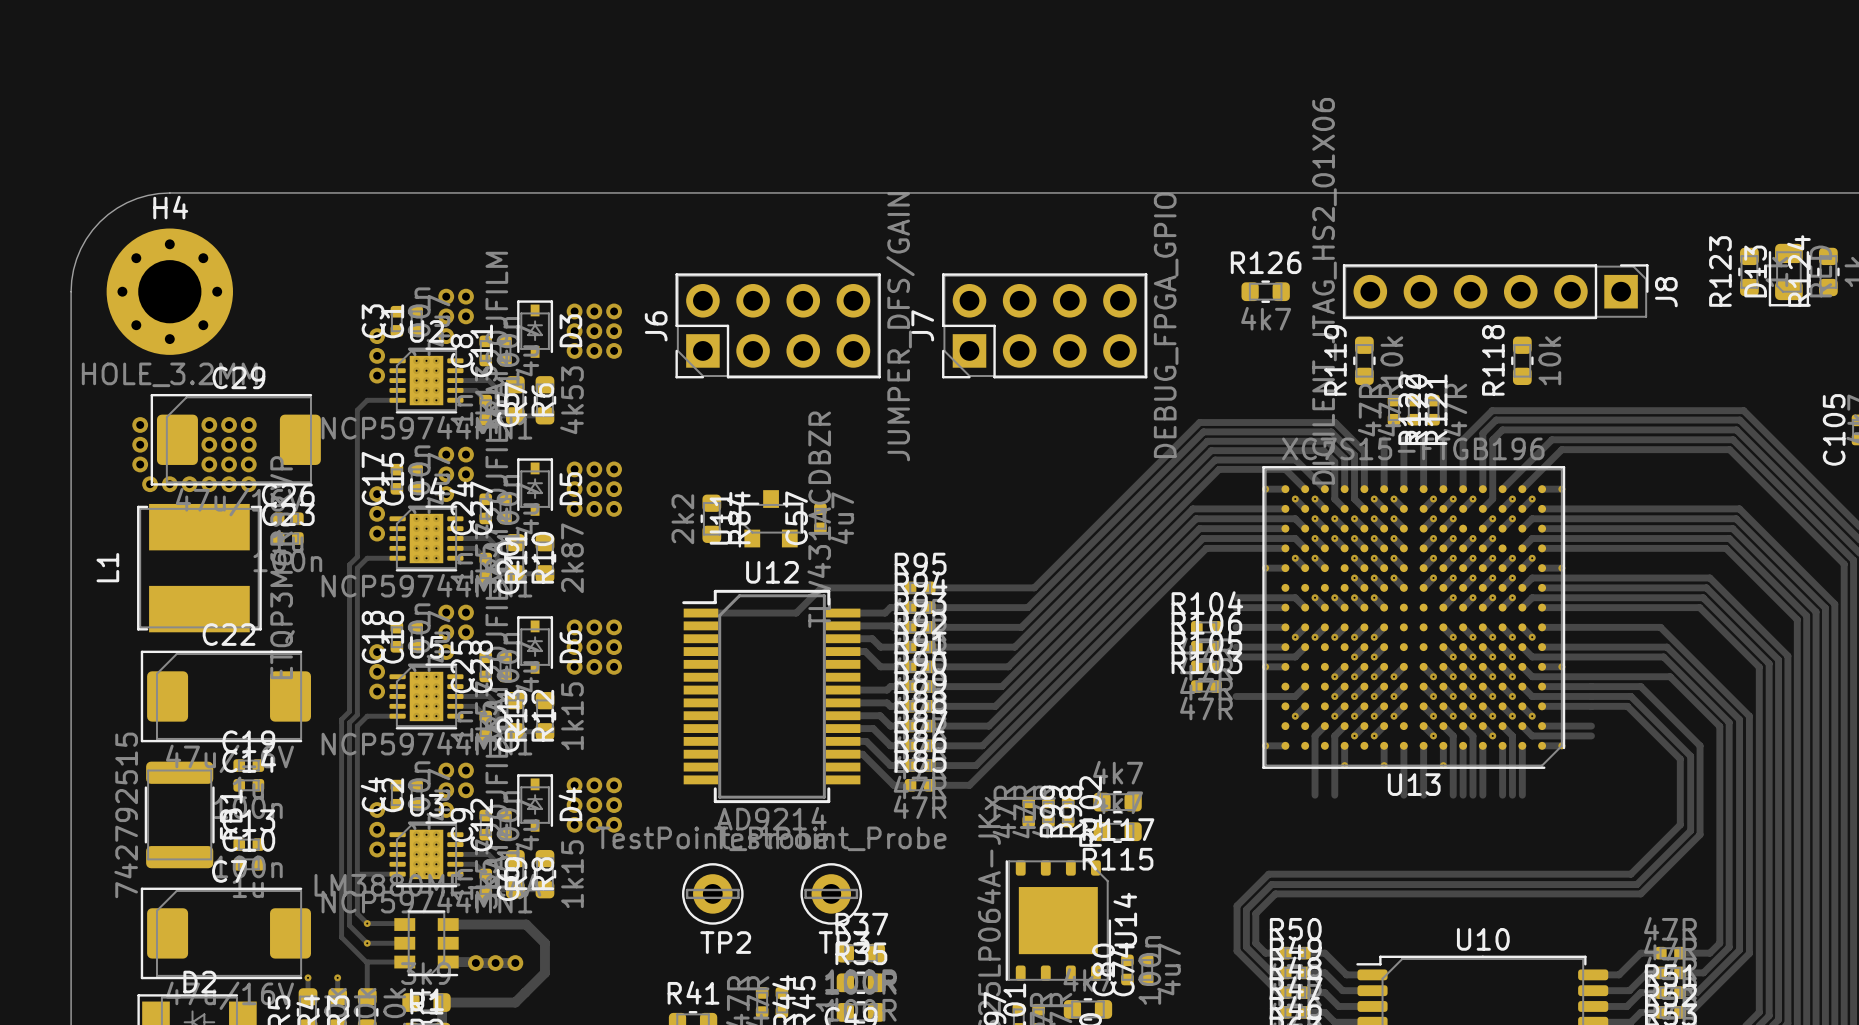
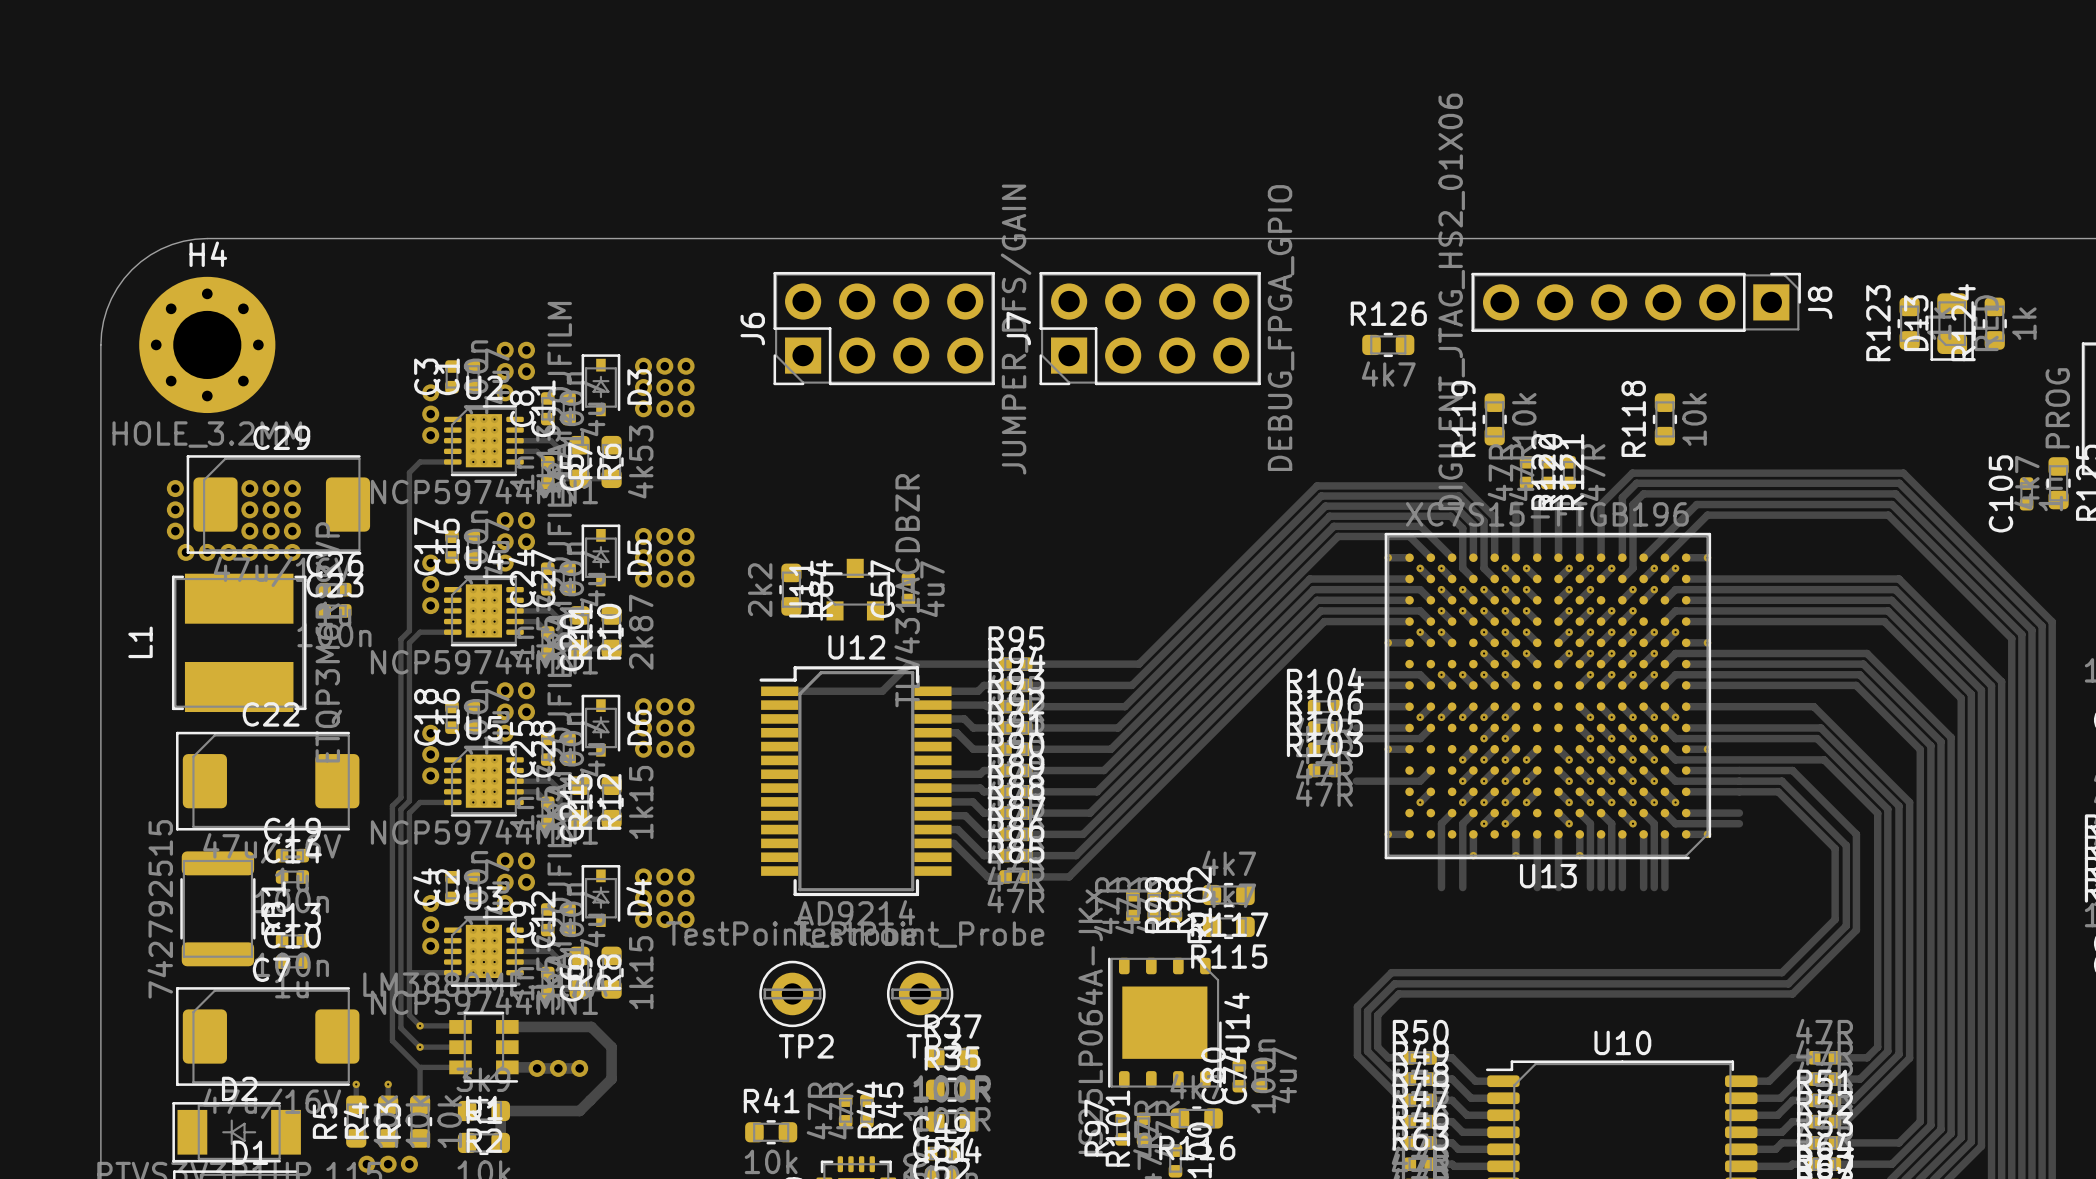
J8 position: (1495, 291) -> (1636, 302)
J6 position: (778, 325) -> (884, 328)
J7 position: (1044, 325) -> (1150, 328)

